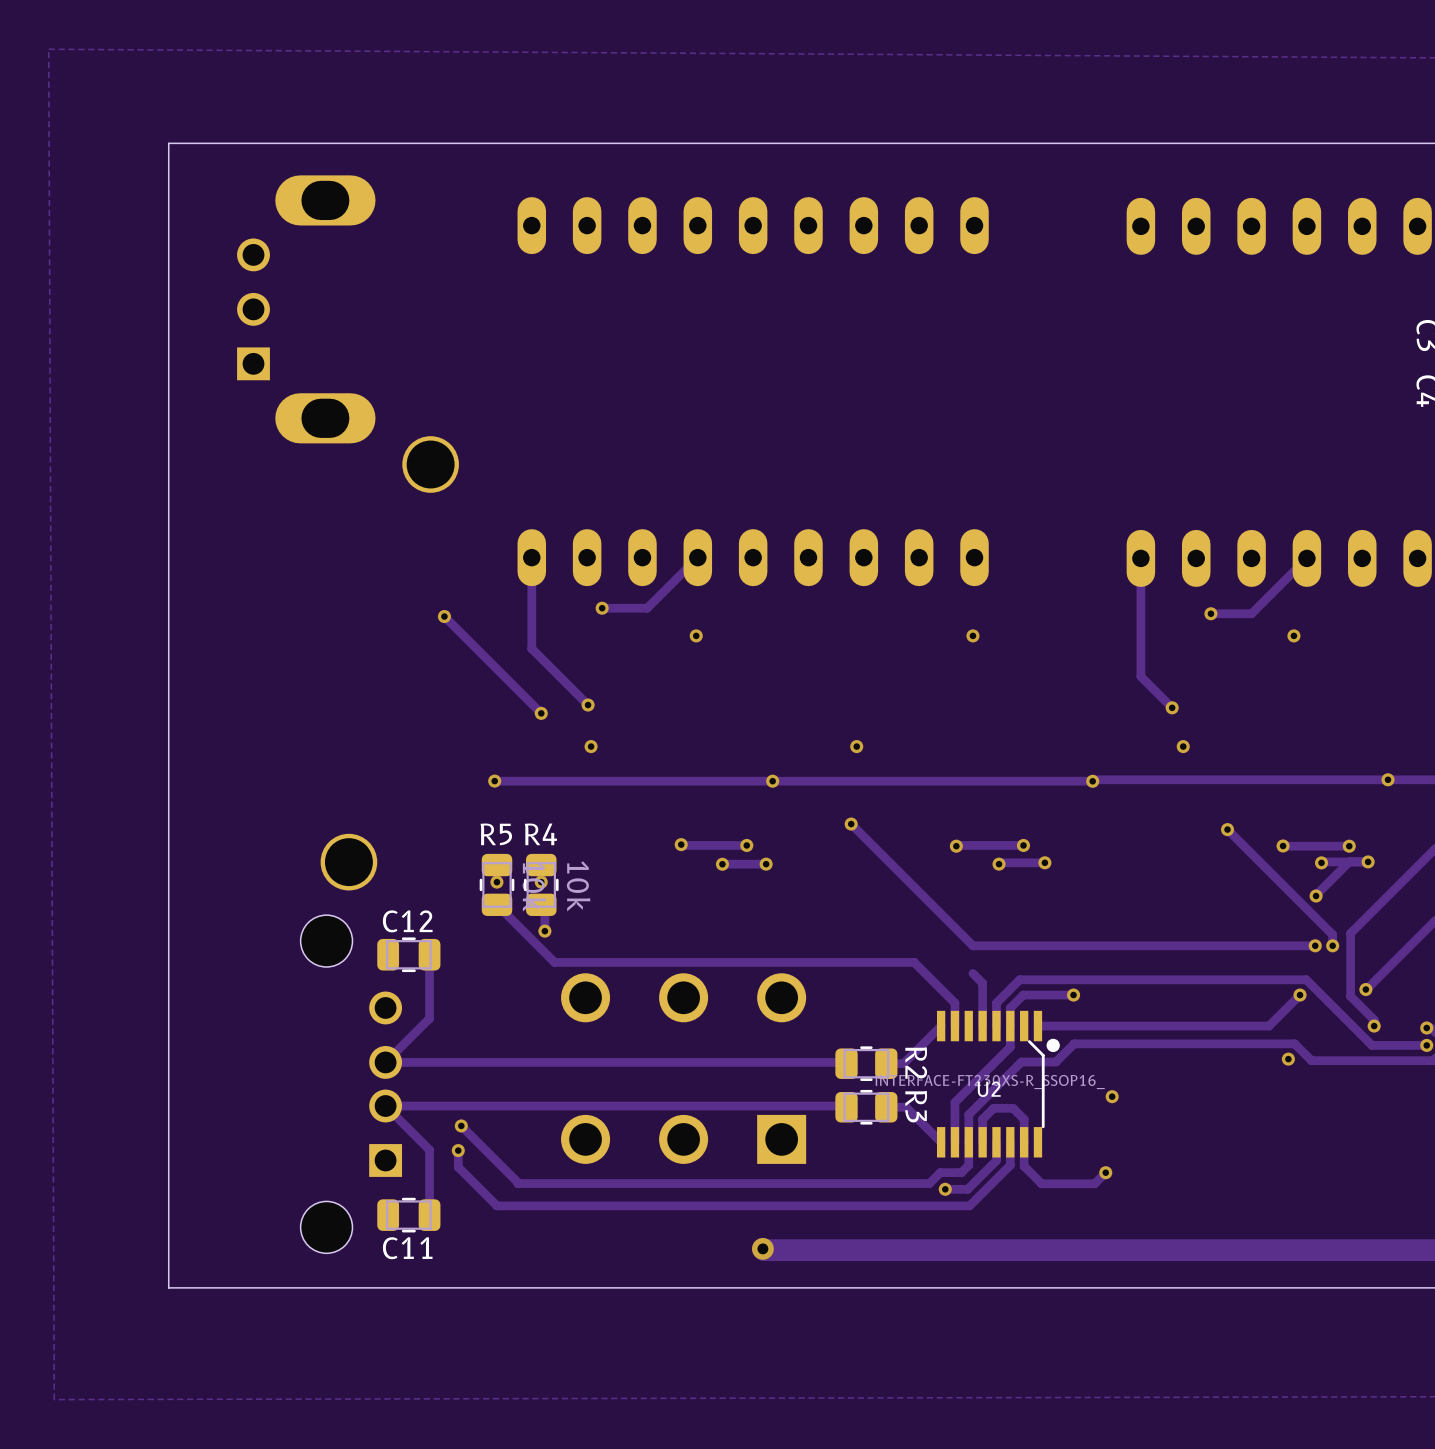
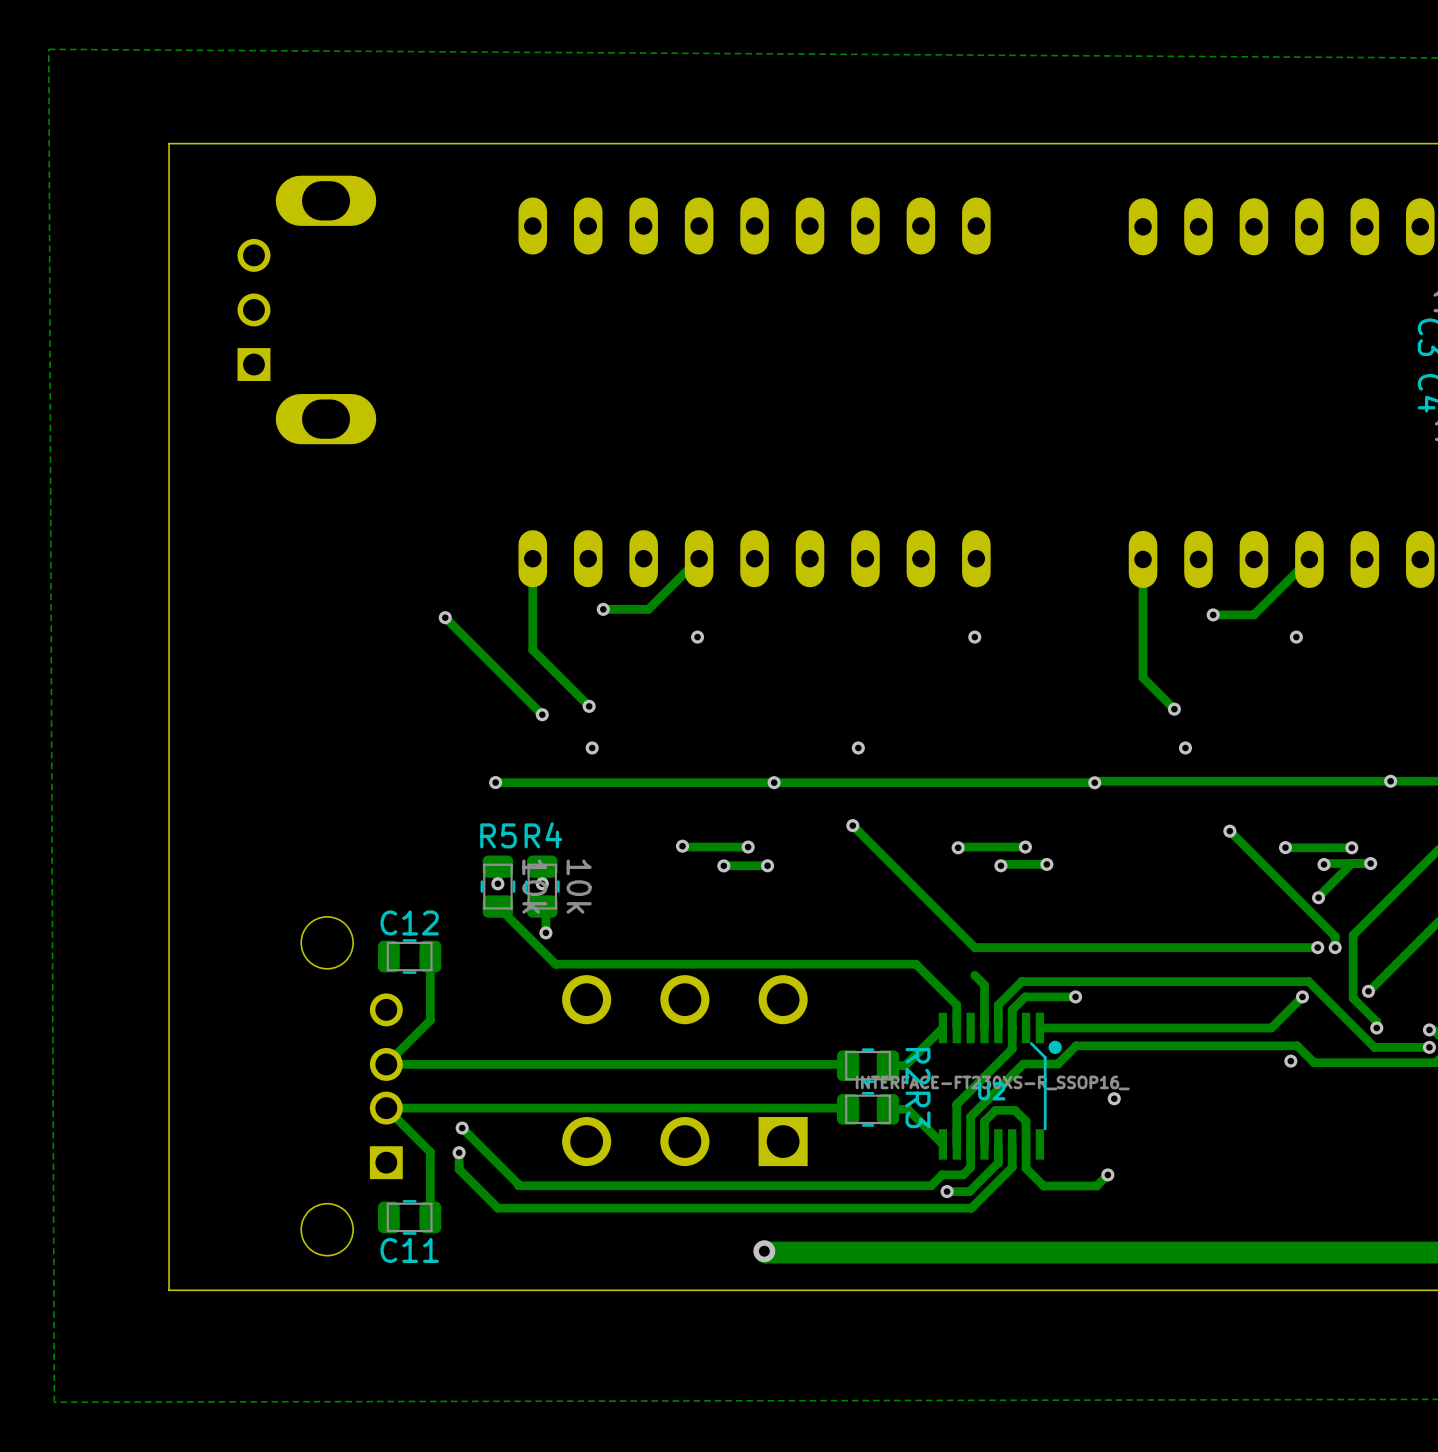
part: (430, 464) -> none
part: (348, 862) -> none

